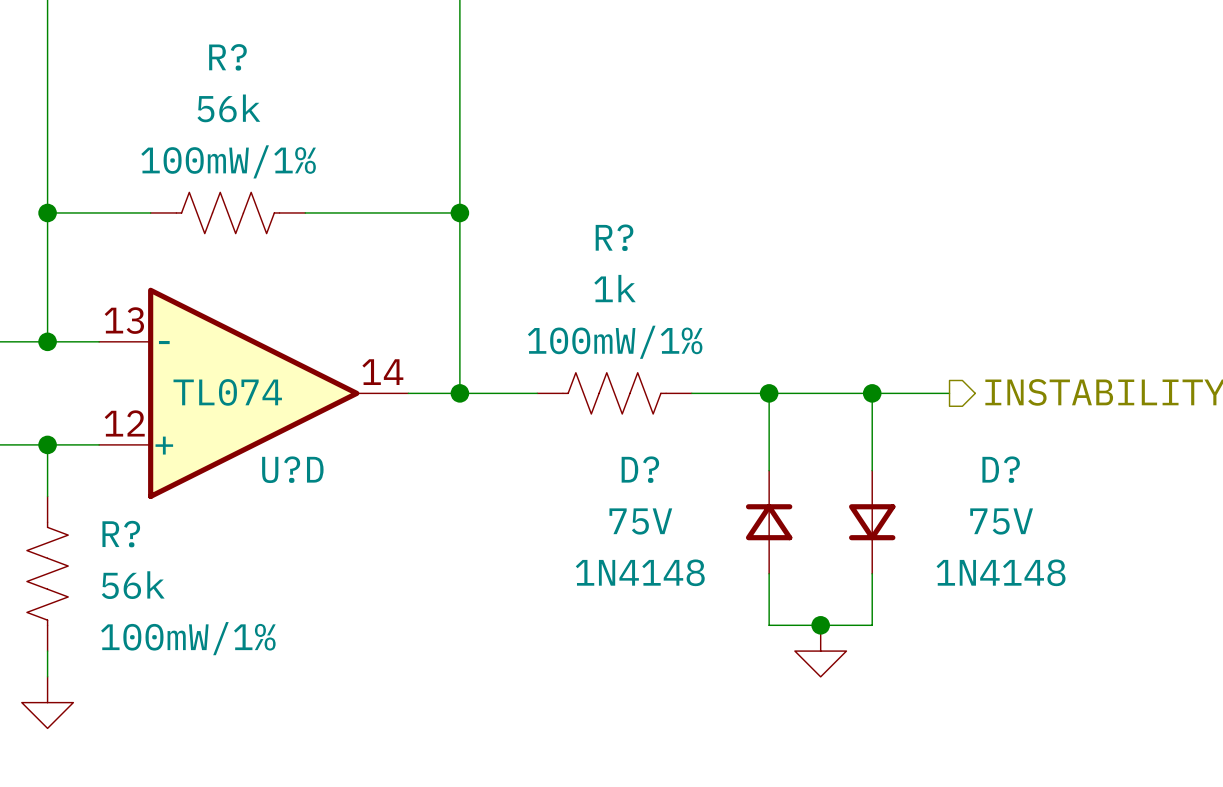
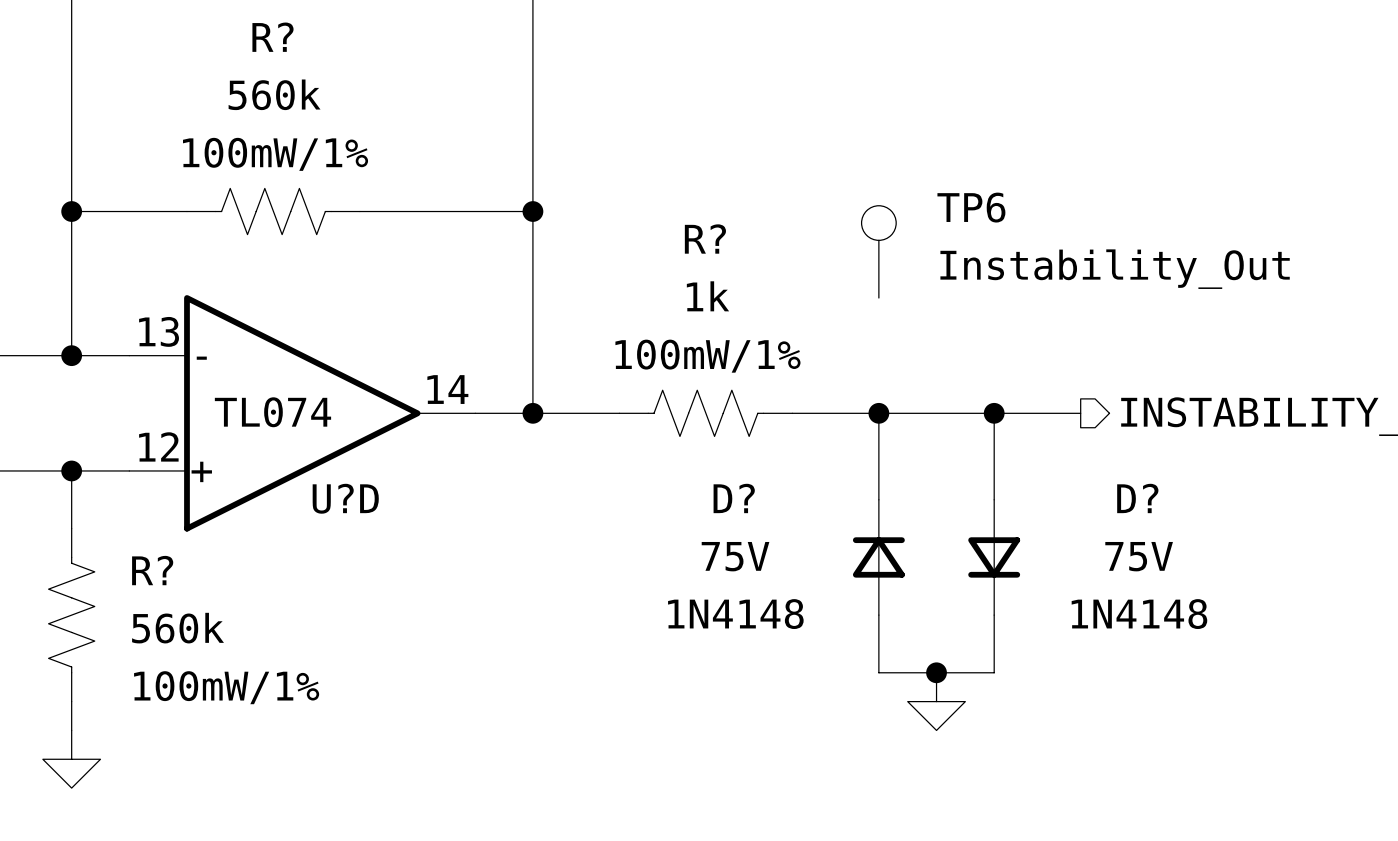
R? value: 56k (228, 108) -> 560k (274, 94)
TP6: none -> Instability_Out (878, 251)
R? value: 56k (133, 585) -> 560k (178, 628)

